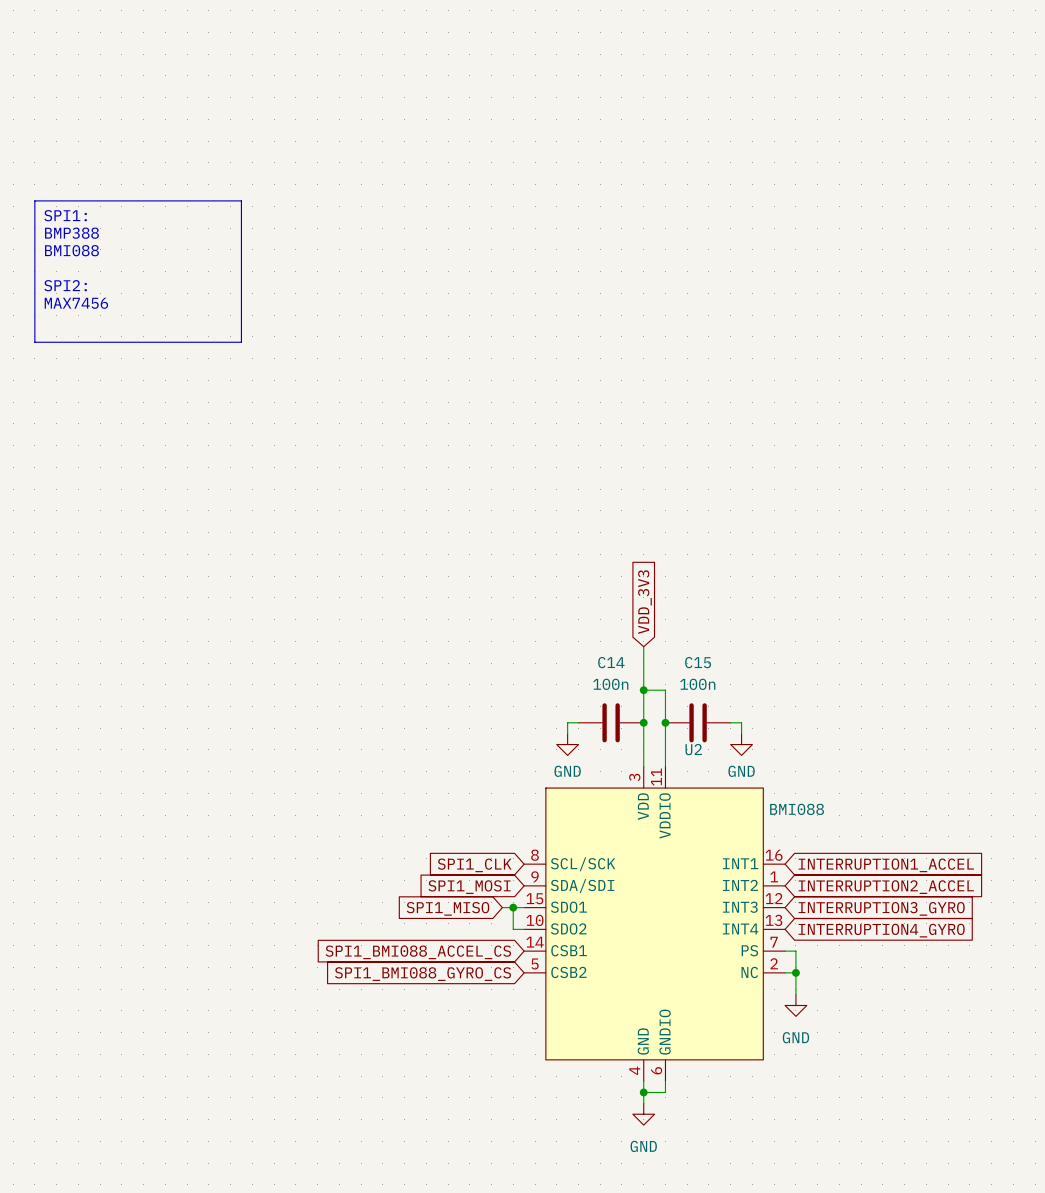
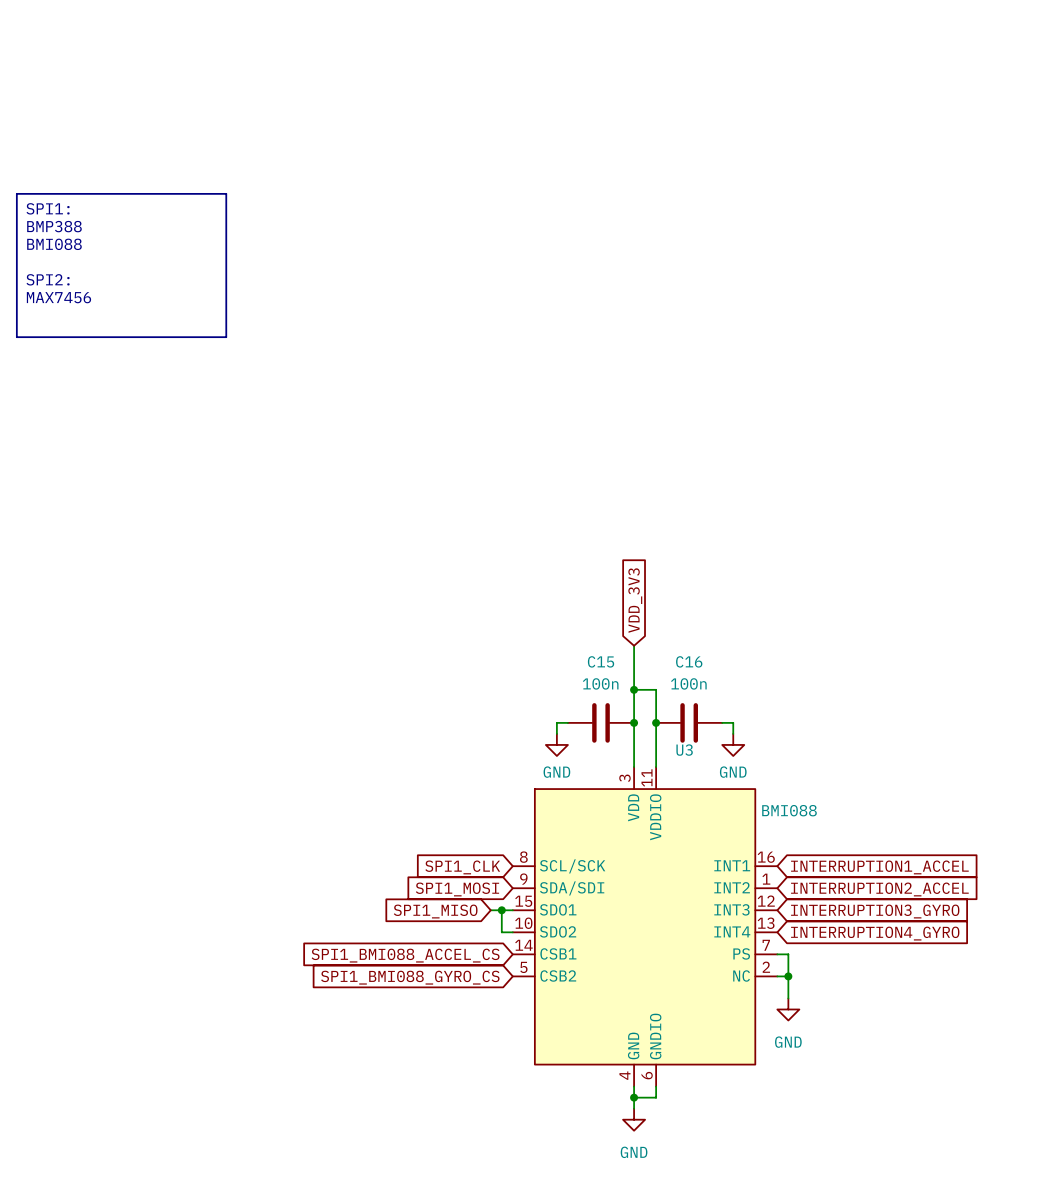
C14 name: C14 (611, 662) -> C15 (601, 661)
C15 name: C15 (698, 662) -> C16 (689, 661)
U2 name: U2 (693, 749) -> U3 (684, 750)

